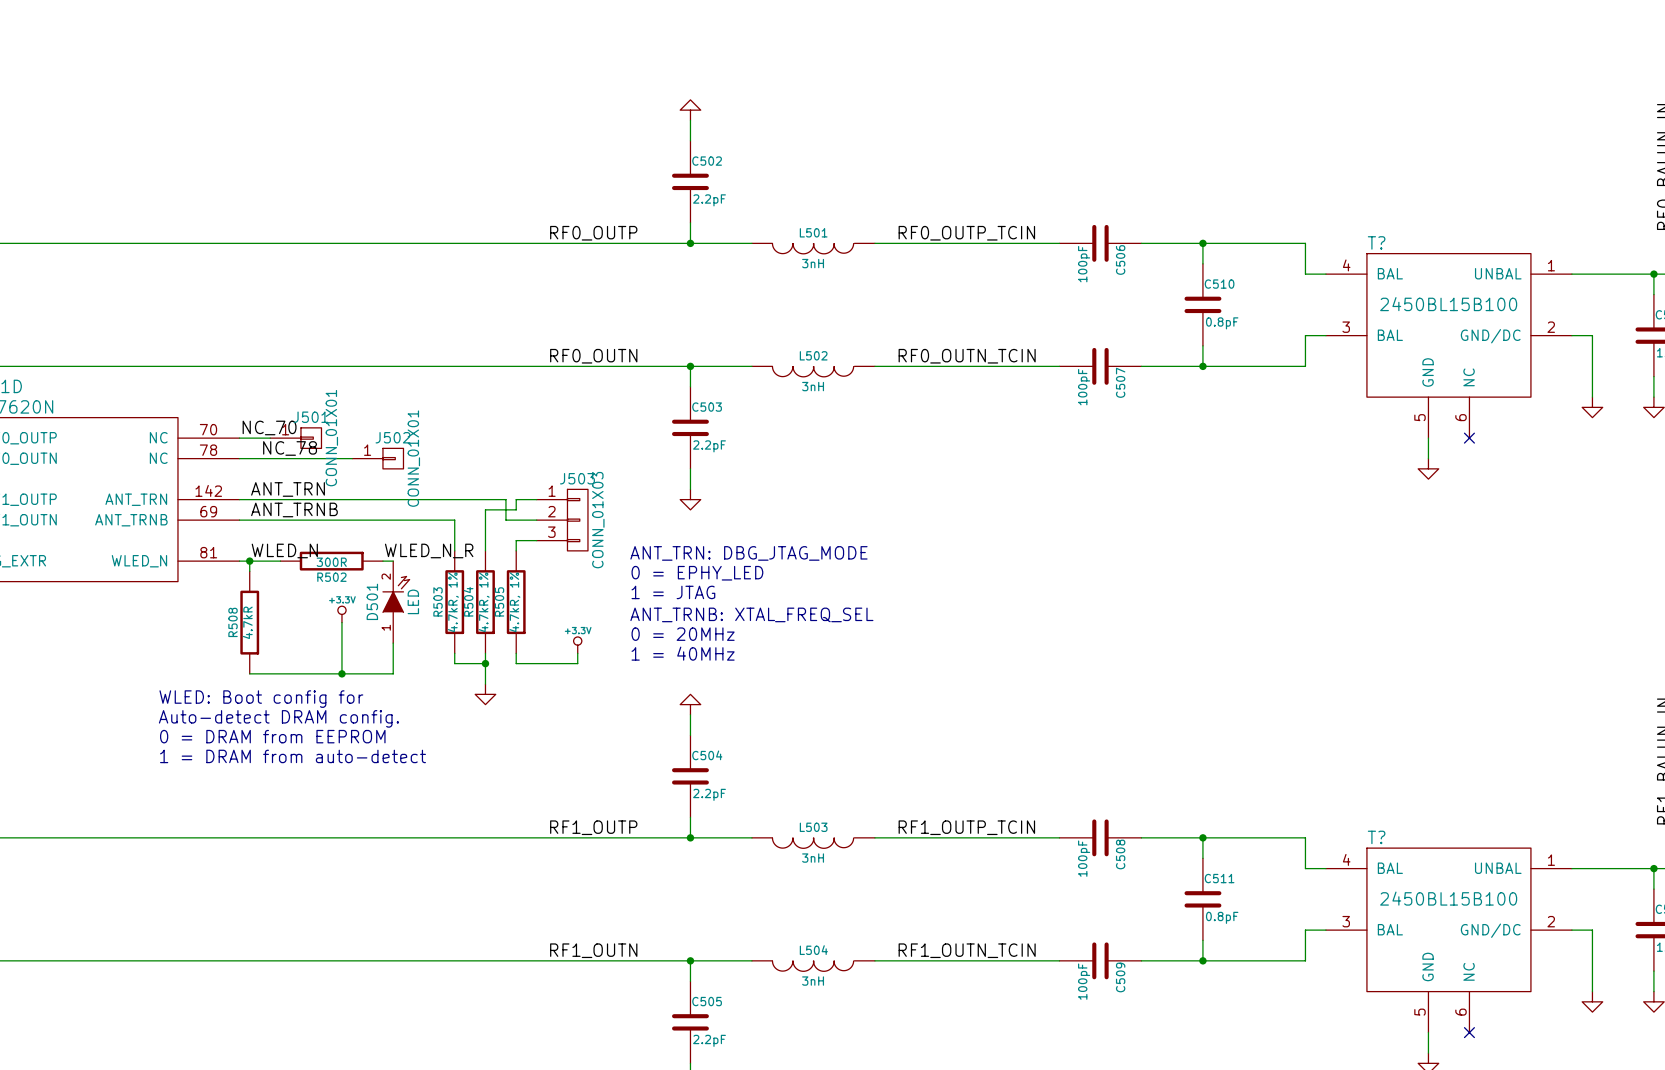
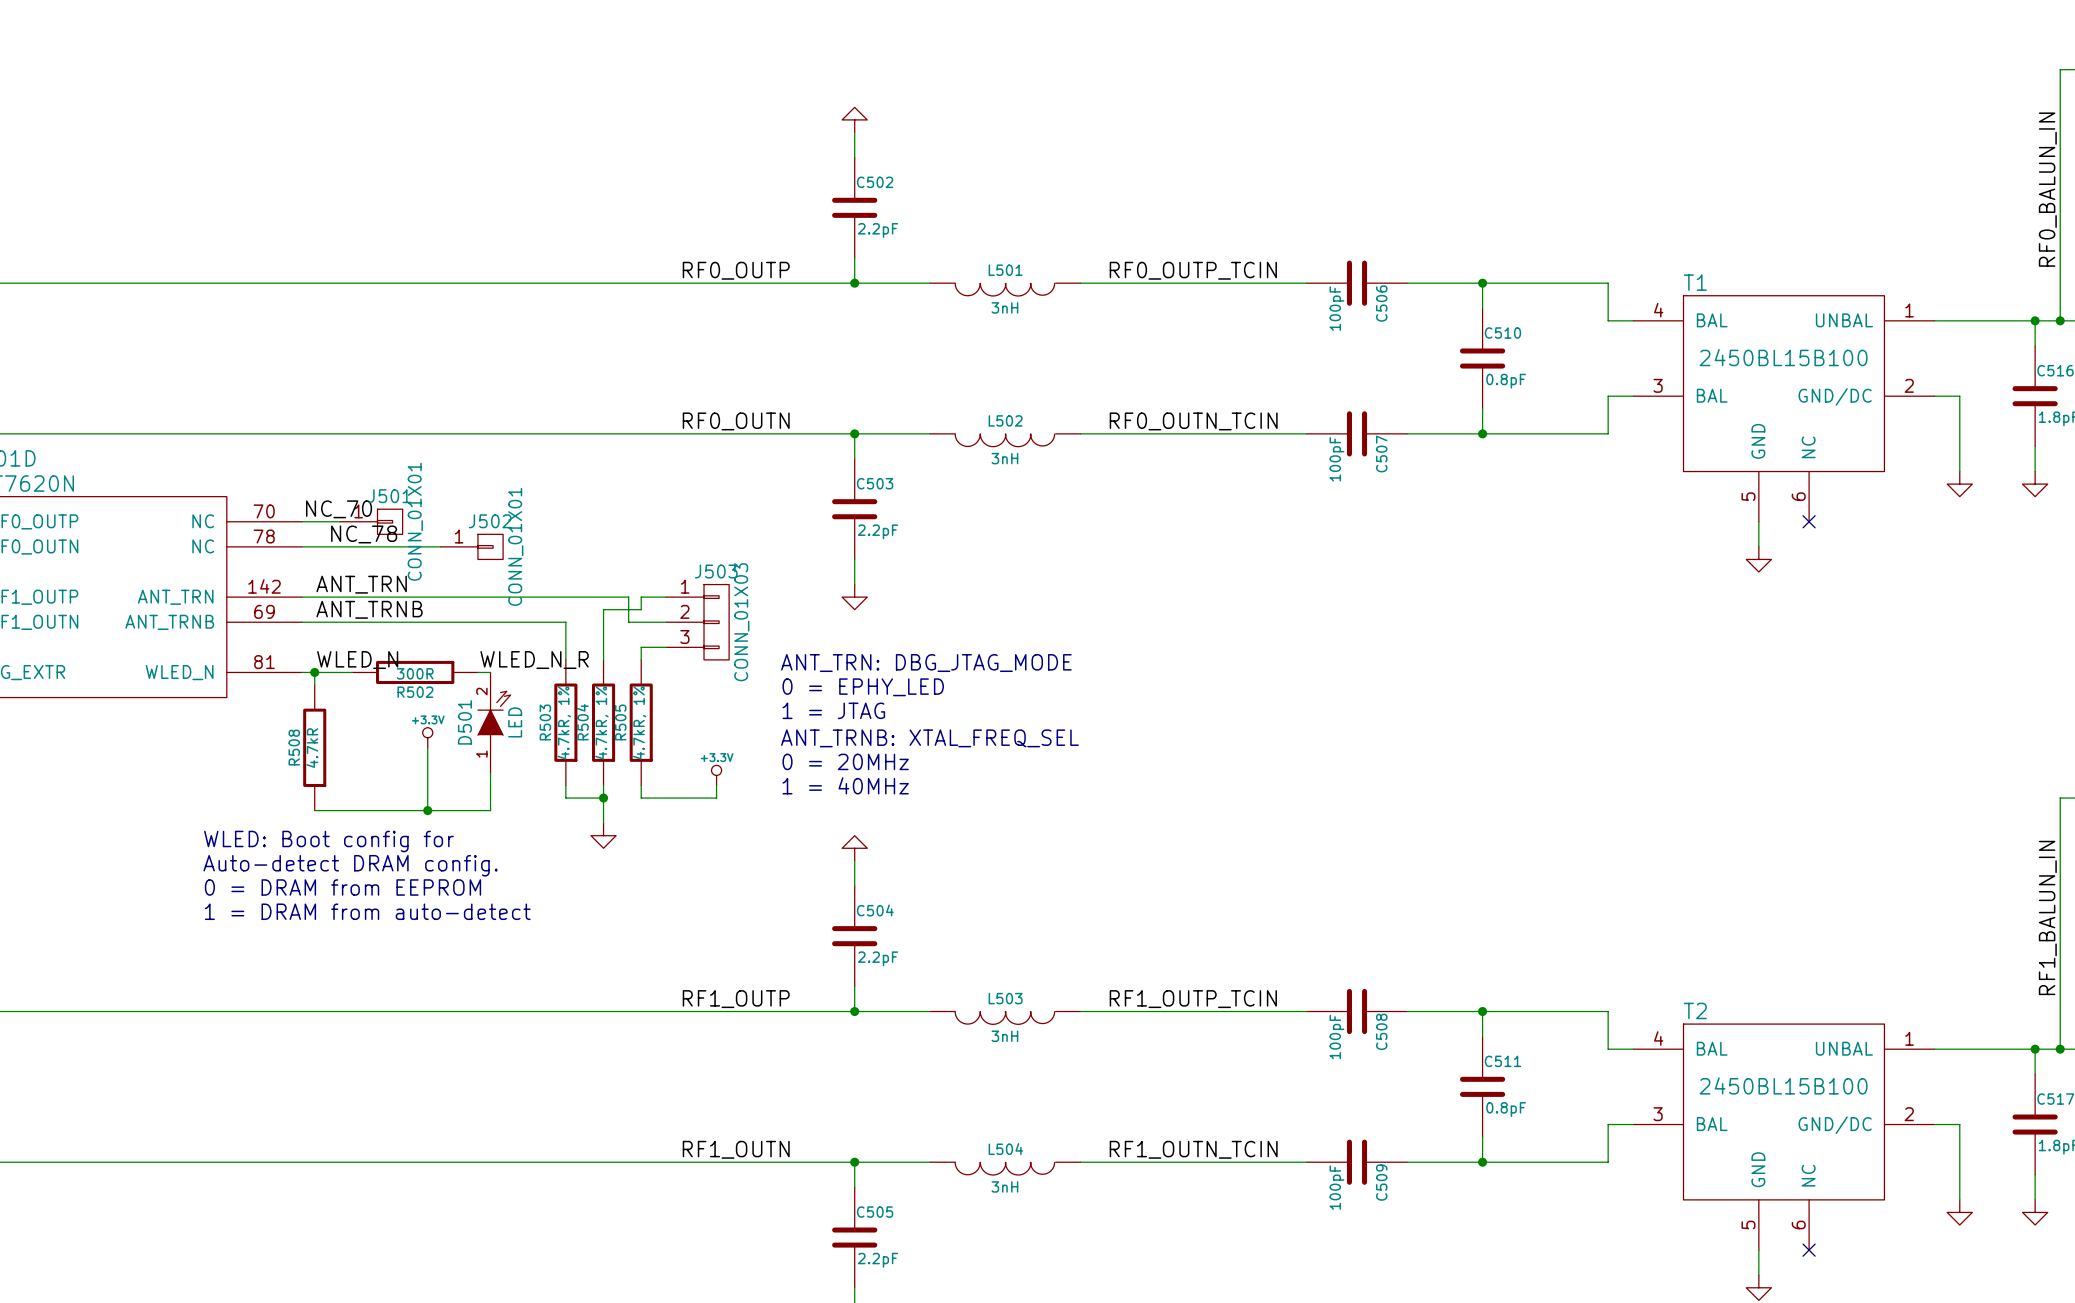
T? name: T? (1376, 242) -> T1 (1695, 282)
T? name: T? (1376, 837) -> T2 (1695, 1010)

